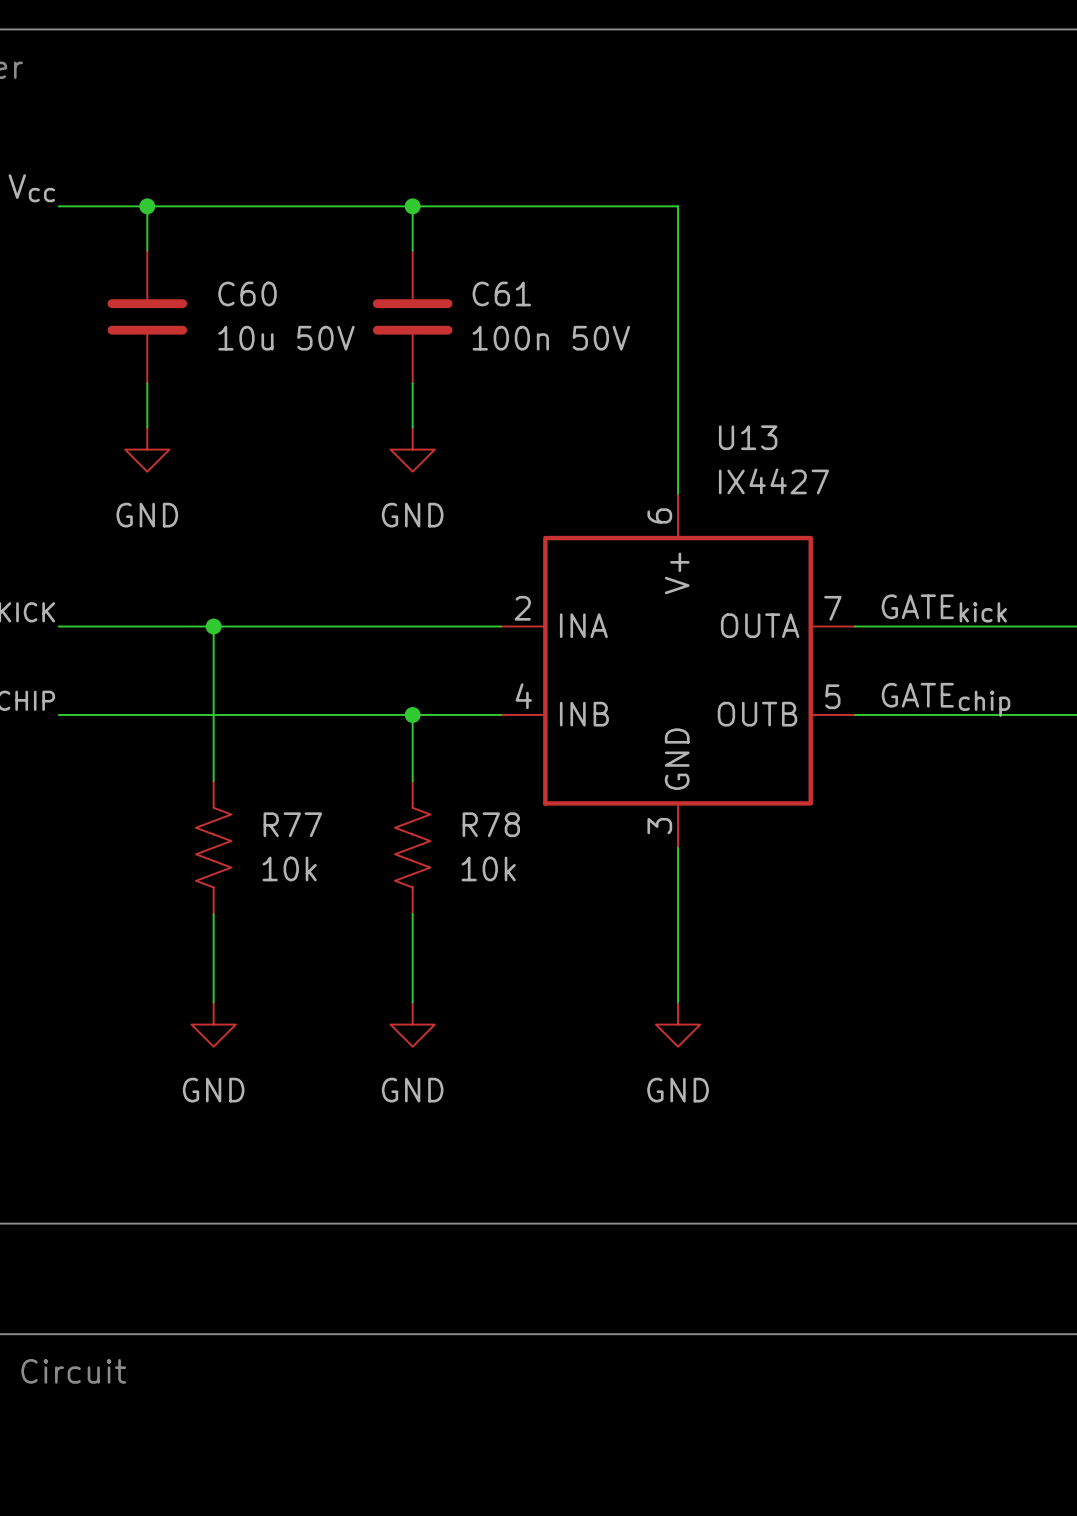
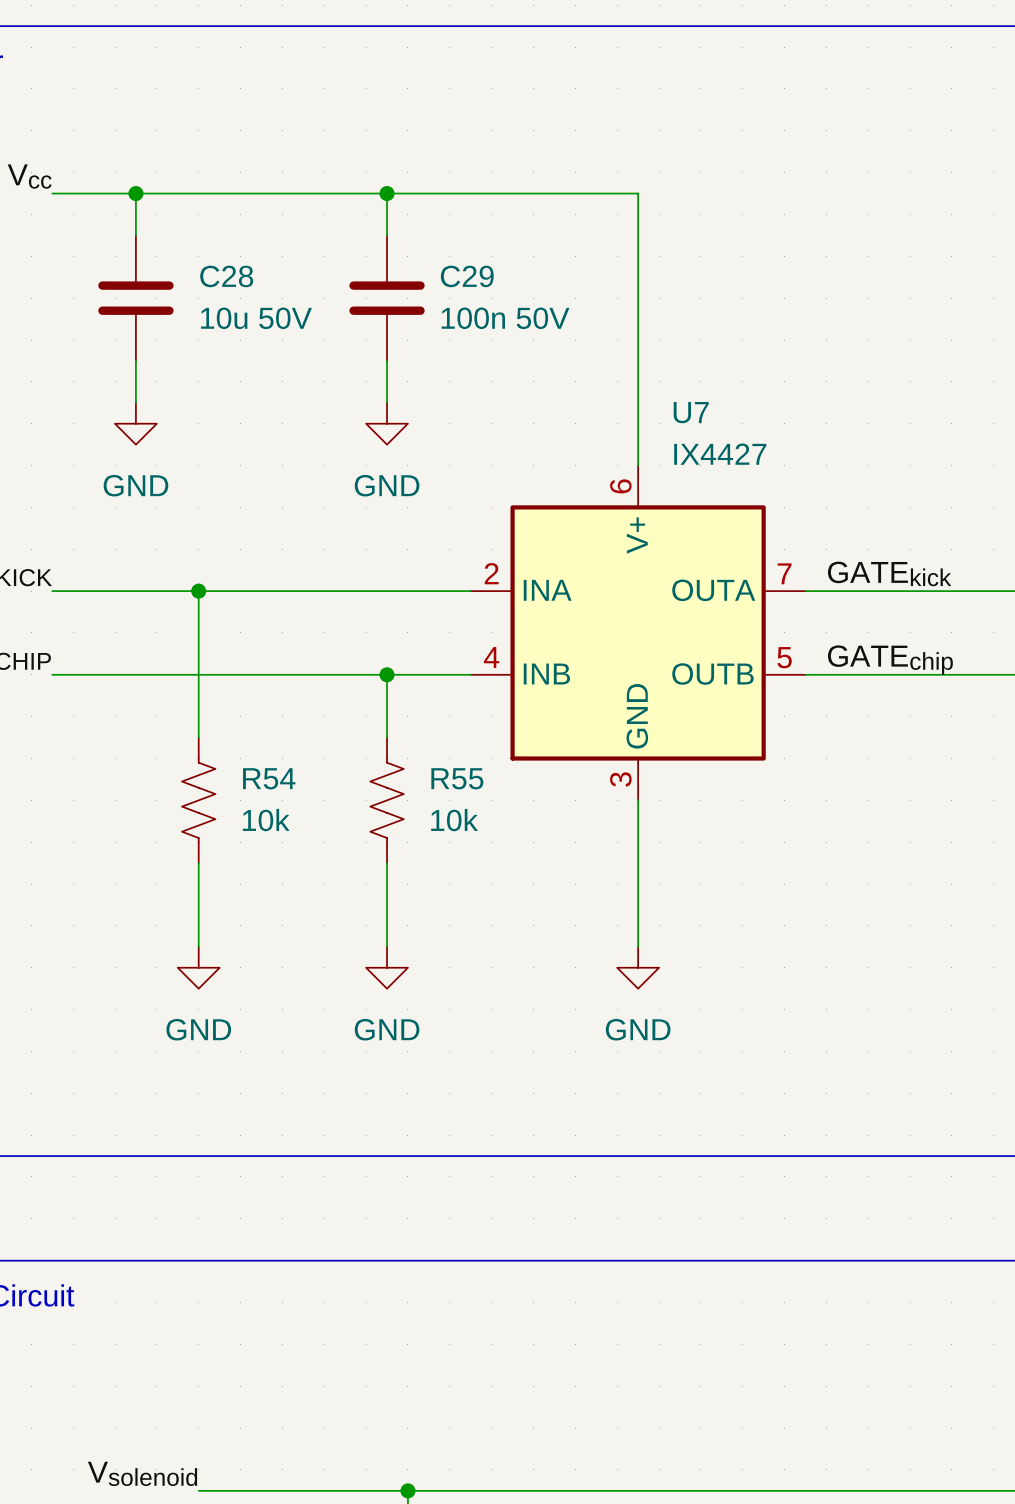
C60 name: C60 (247, 293) -> C28 (226, 276)
C61 name: C61 (501, 293) -> C29 (467, 276)
U13 name: U13 (748, 437) -> U7 (691, 412)
R77 name: R77 (292, 824) -> R54 (269, 778)
R78 name: R78 (491, 824) -> R55 (457, 778)

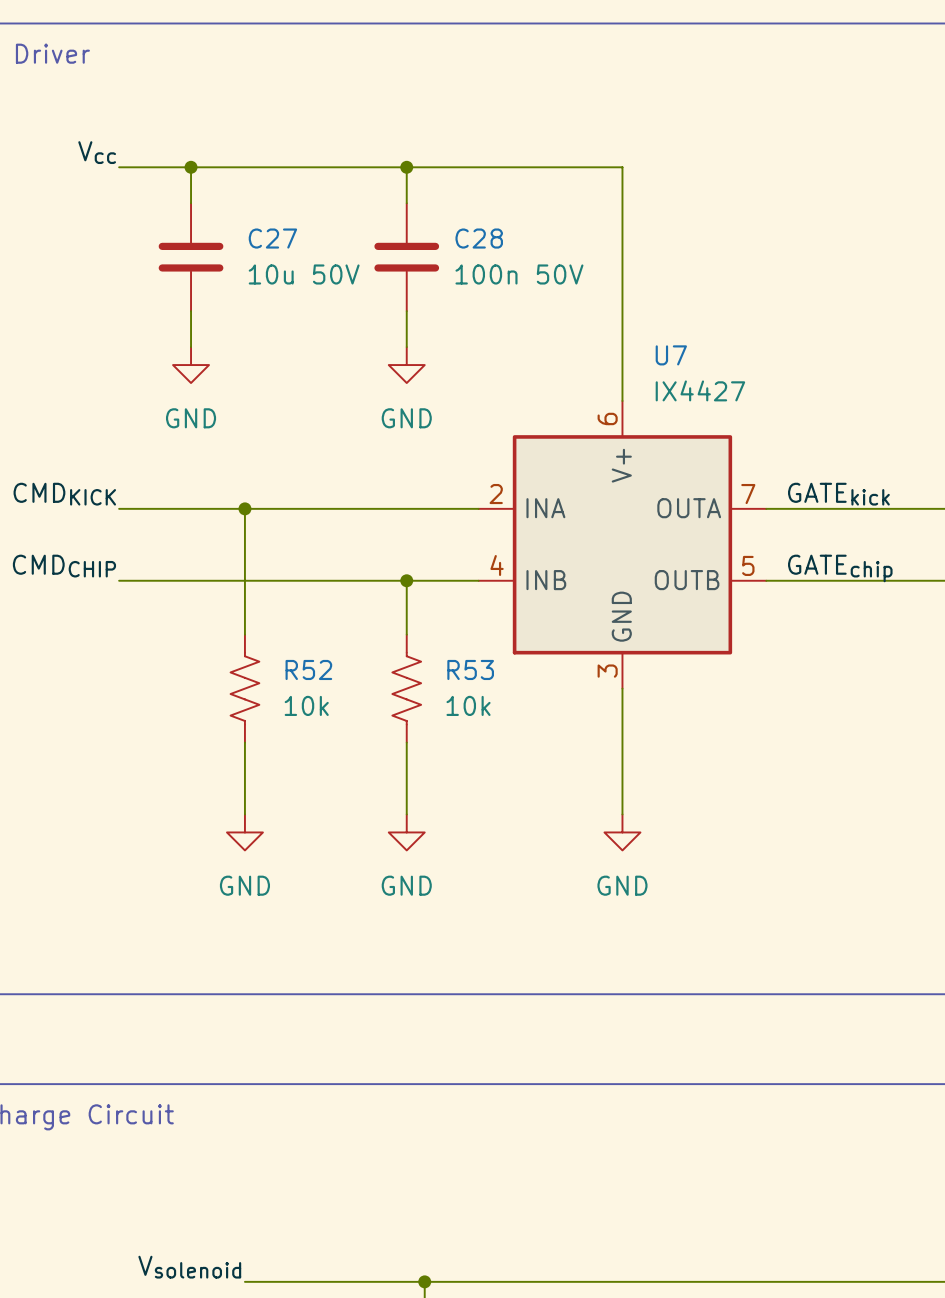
C28 name: C28 (226, 276) -> C27 (272, 238)
C29 name: C29 (467, 276) -> C28 (479, 238)
R54 name: R54 (269, 778) -> R52 (308, 669)
R55 name: R55 (457, 778) -> R53 (470, 669)

